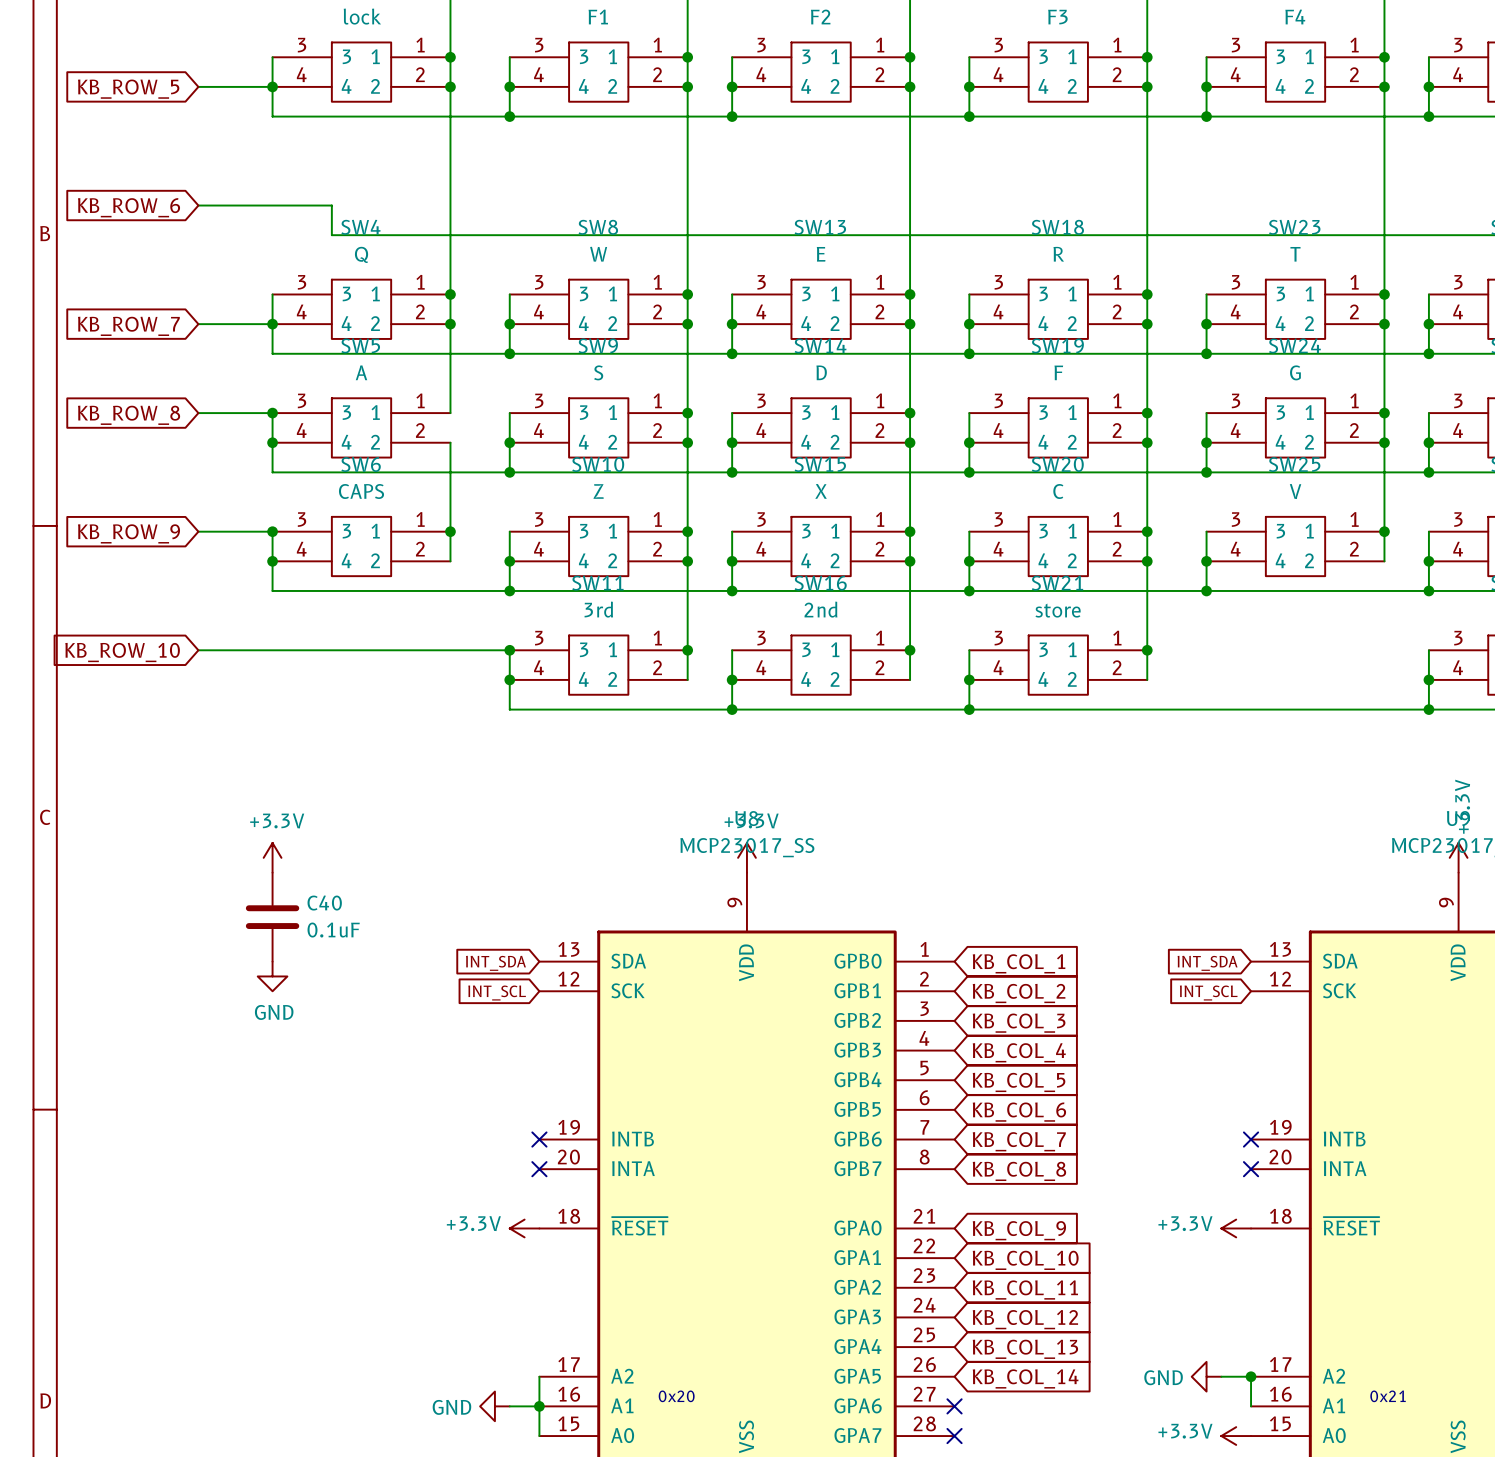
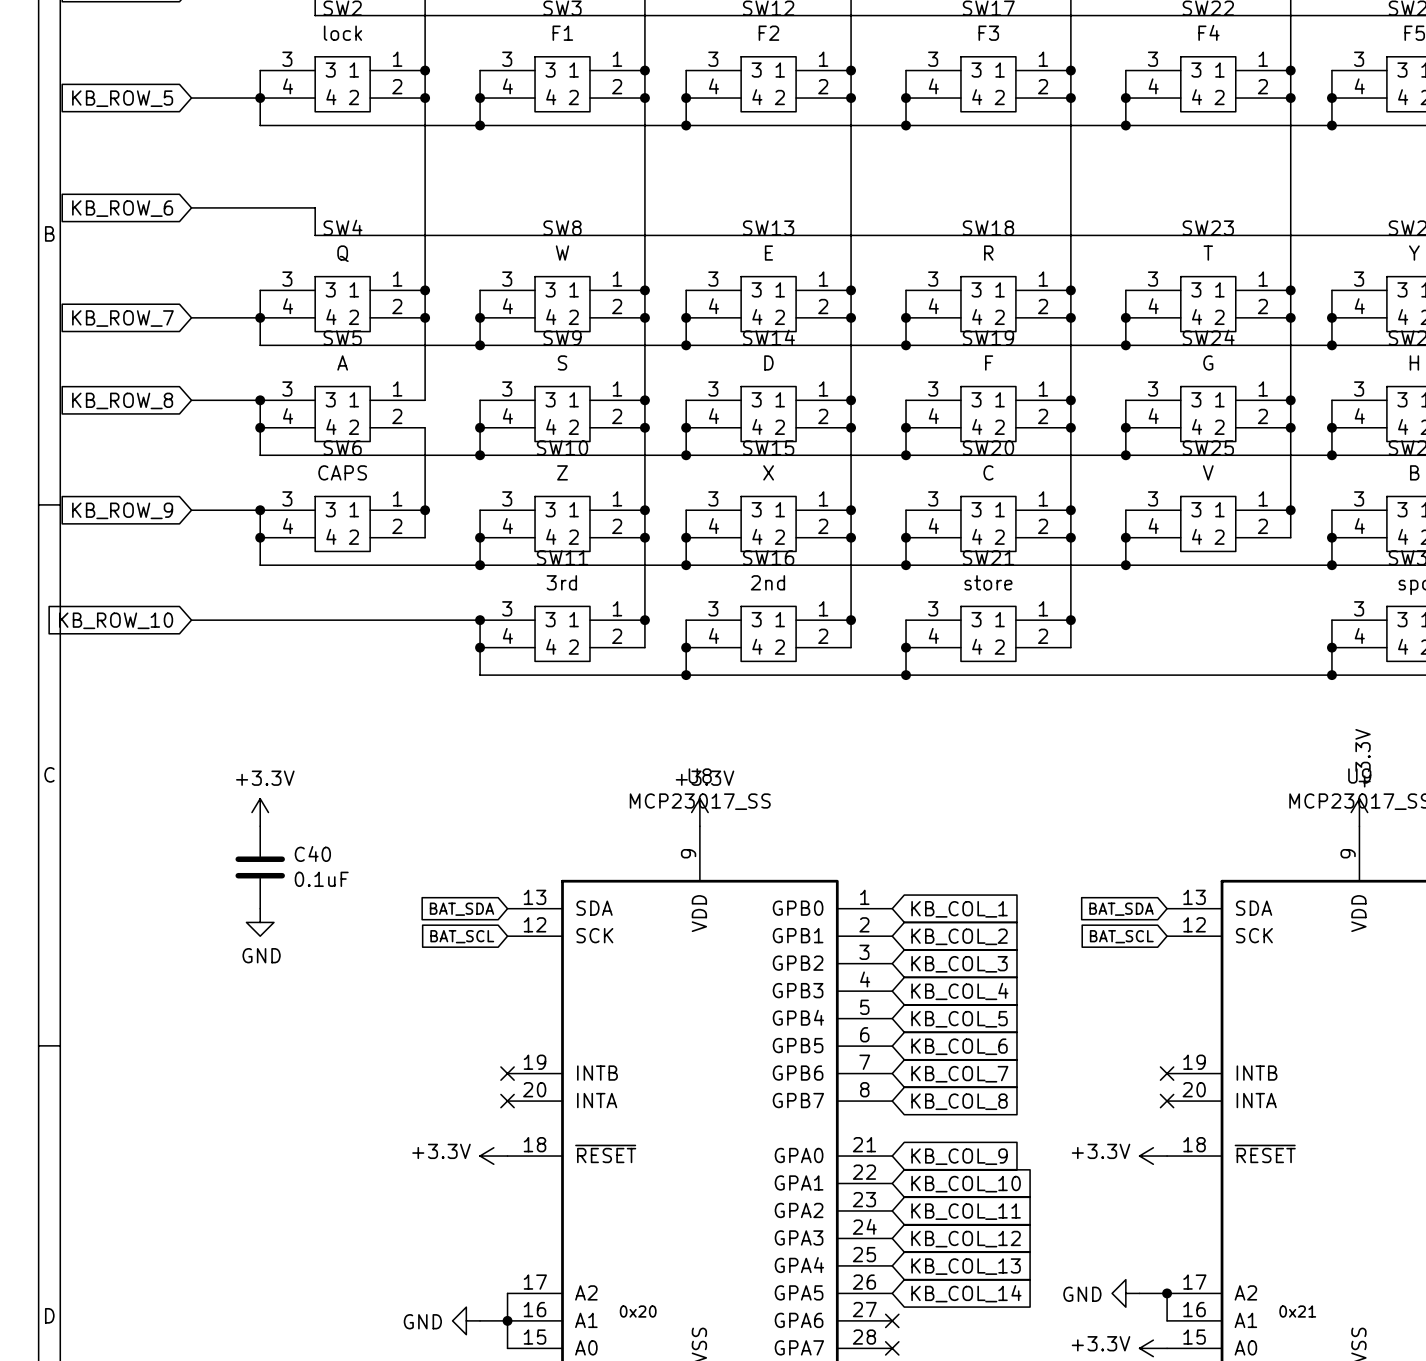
global label: INT_SDA (495, 963) -> BAT_SDA (461, 909)
global label: INT_SDA (1207, 963) -> BAT_SDA (1121, 909)
global label: INT_SCL (497, 993) -> BAT_SCL (462, 936)
global label: INT_SCL (1208, 993) -> BAT_SCL (1121, 936)

